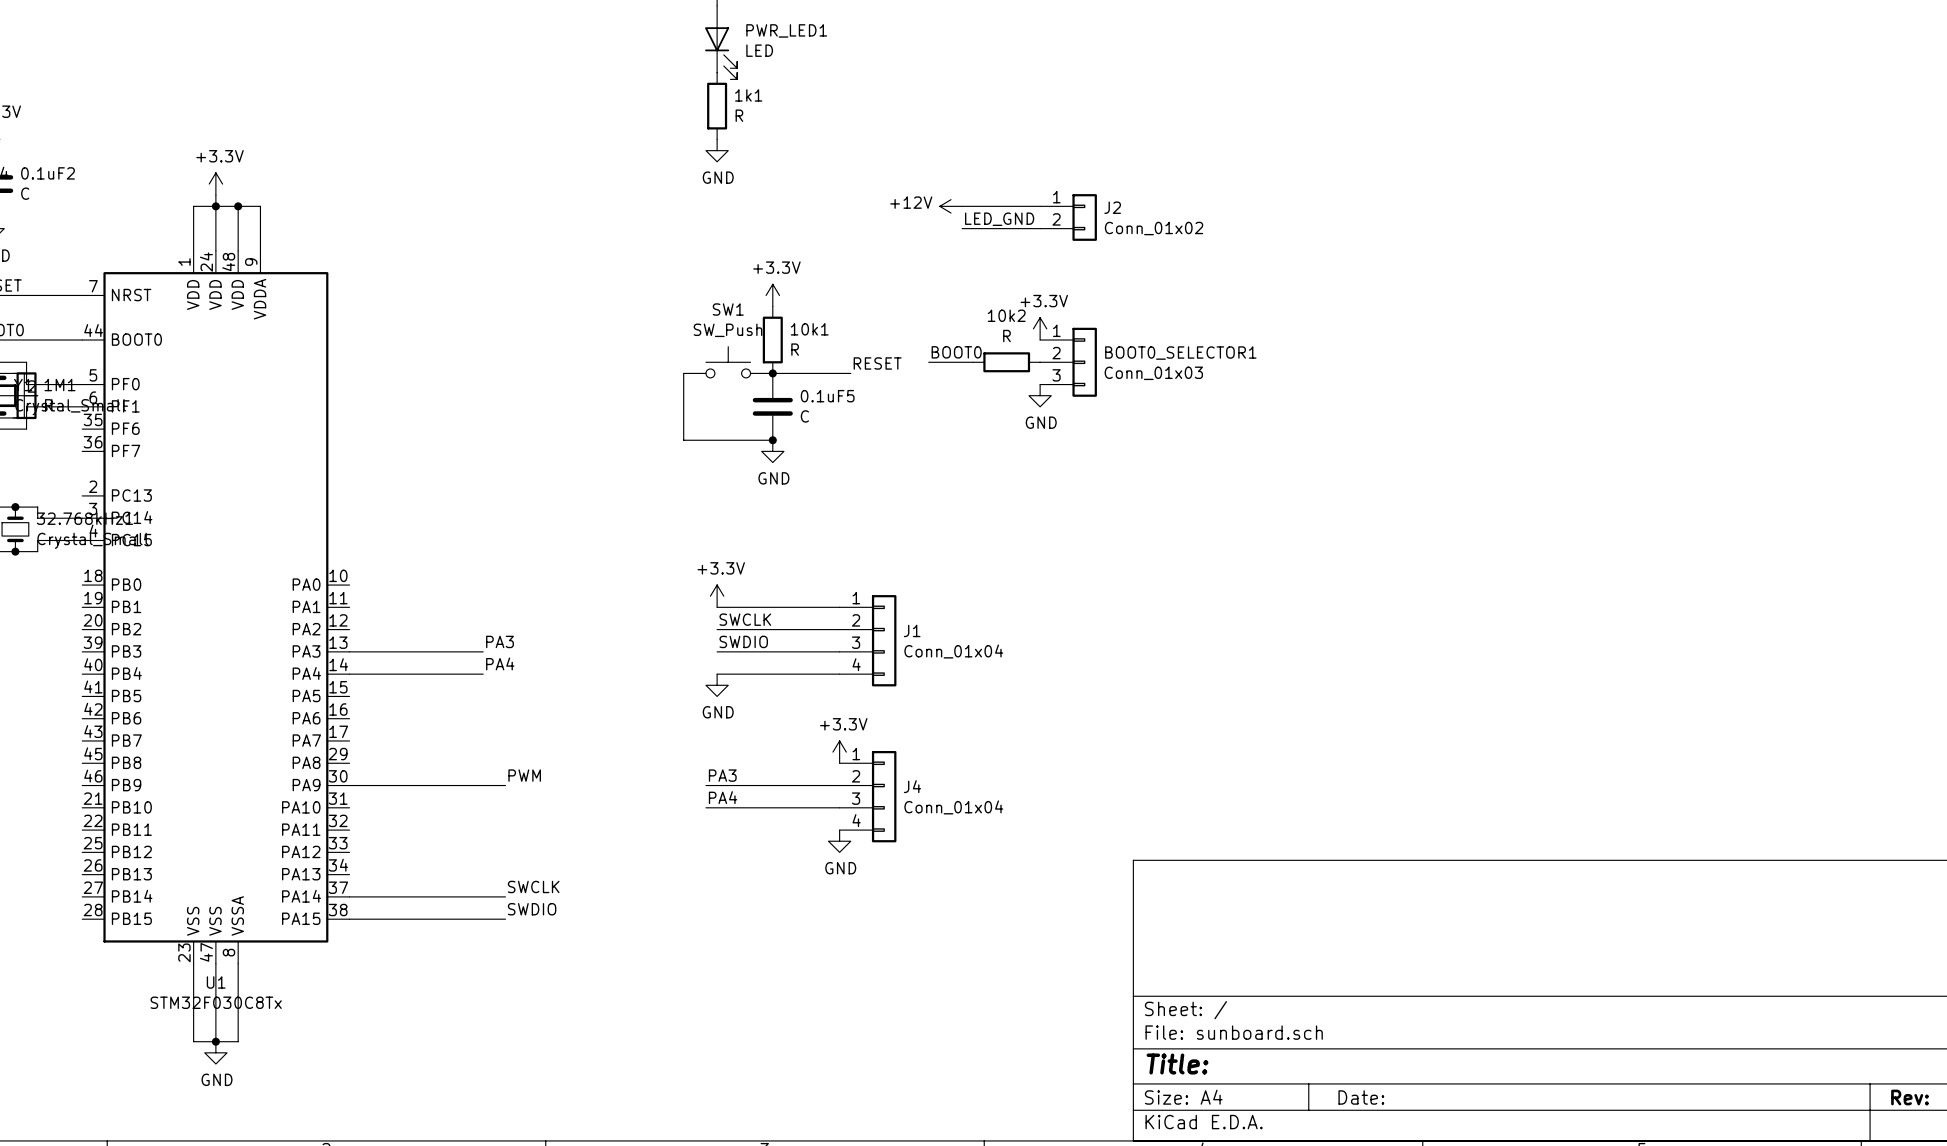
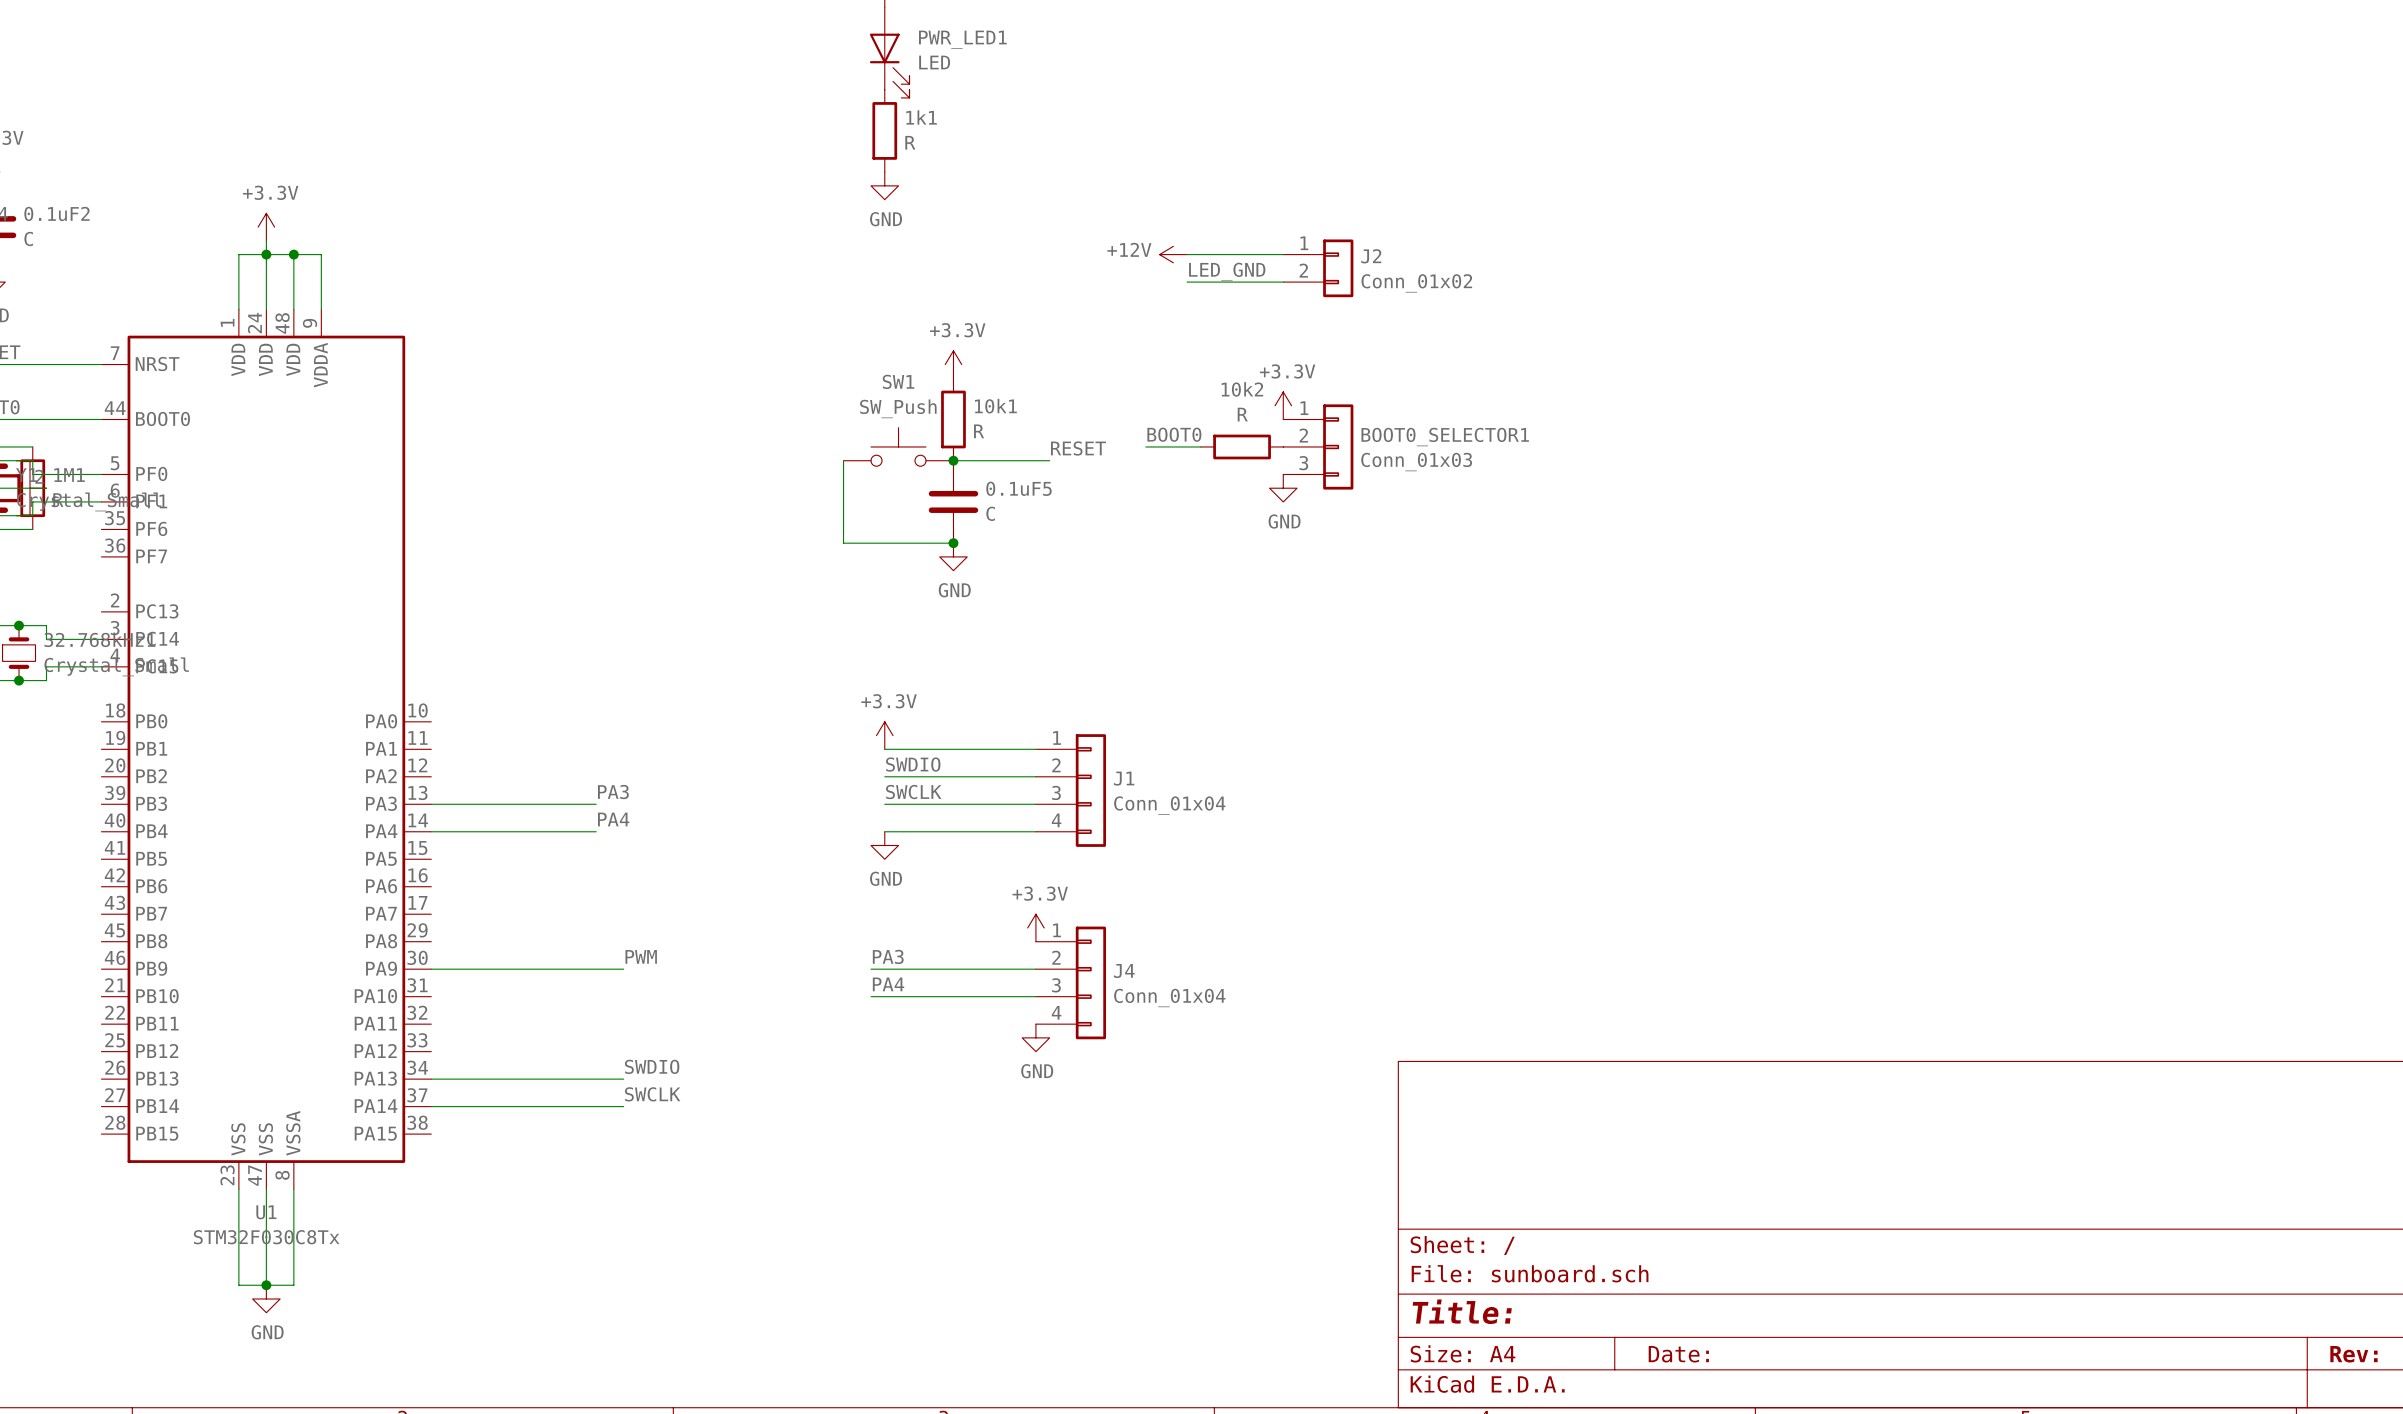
label: SWCLK (745, 619) -> SWDIO (913, 764)
label: SWDIO (743, 641) -> SWCLK (913, 792)
label position: SWDIO (532, 909) -> SWDIO (652, 1066)
wire: (349, 919) (505, 919) -> (431, 1079) (623, 1079)

